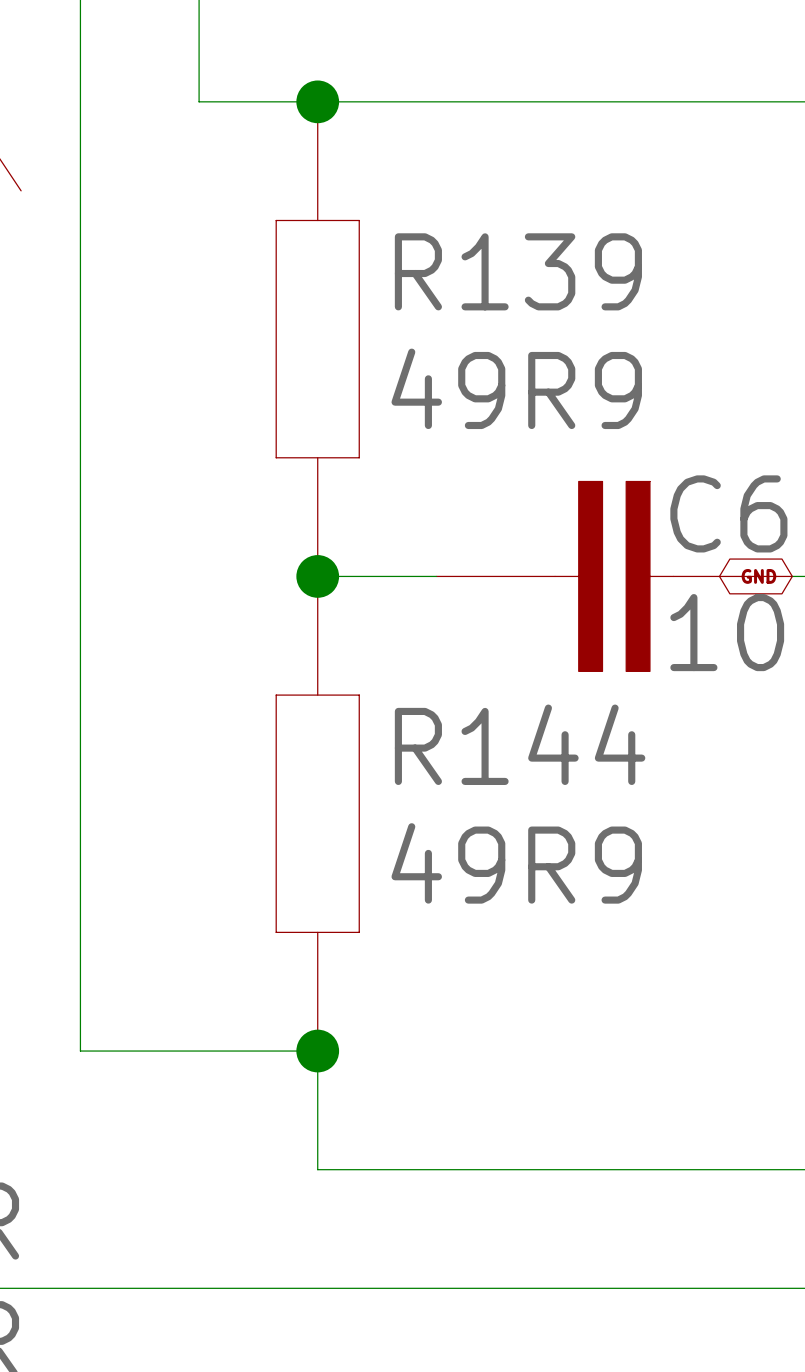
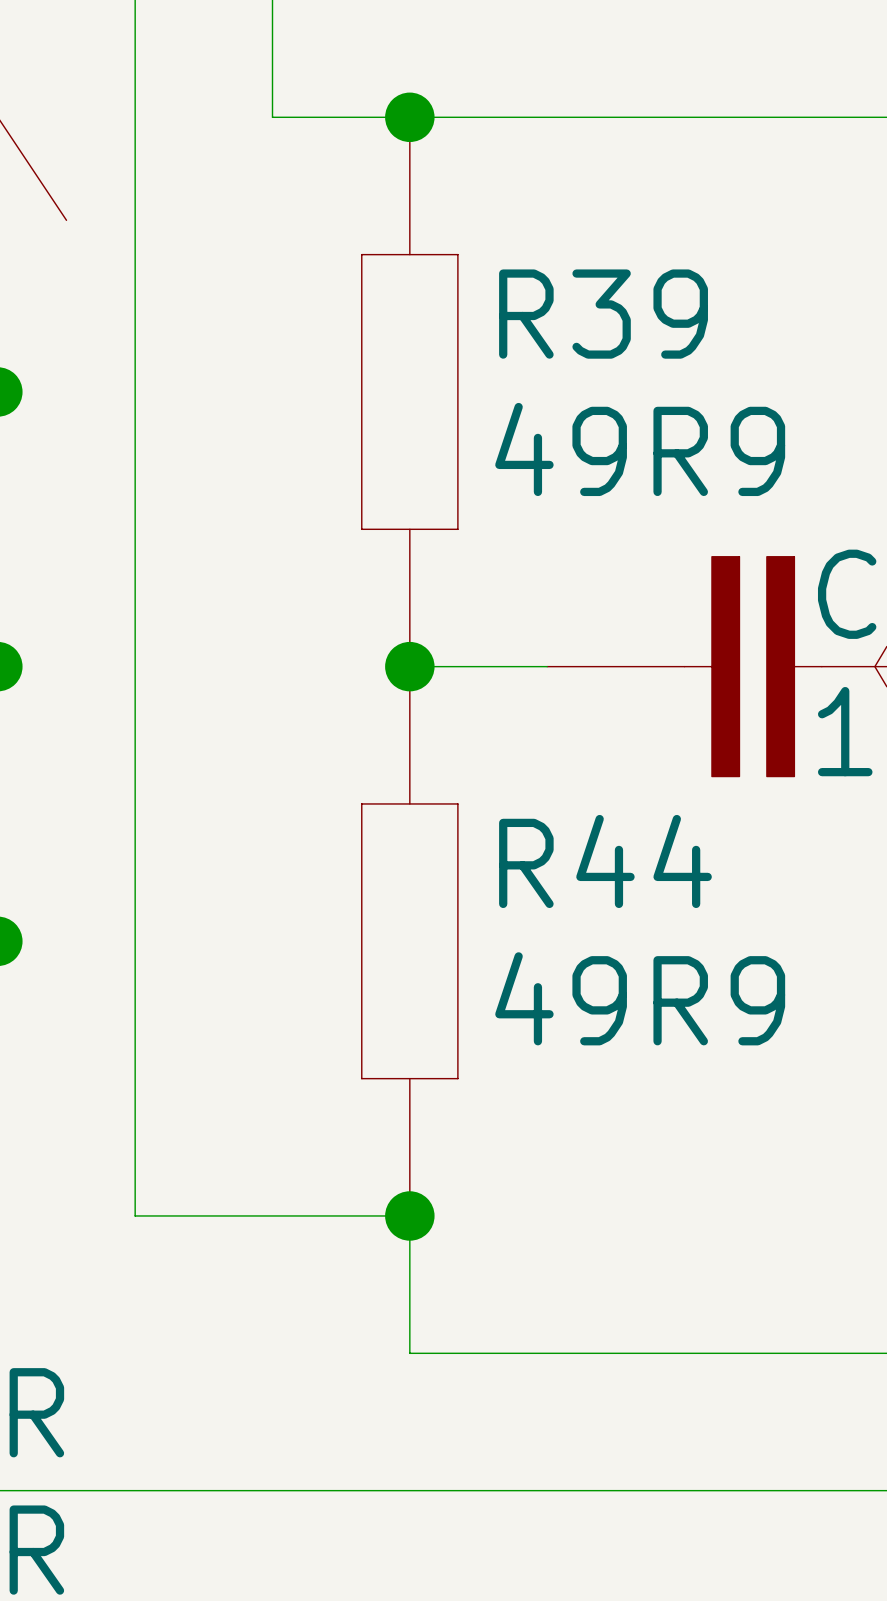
R139 name: R139 (518, 271) -> R39 (603, 314)
R144 name: R144 (520, 744) -> R44 (605, 861)

